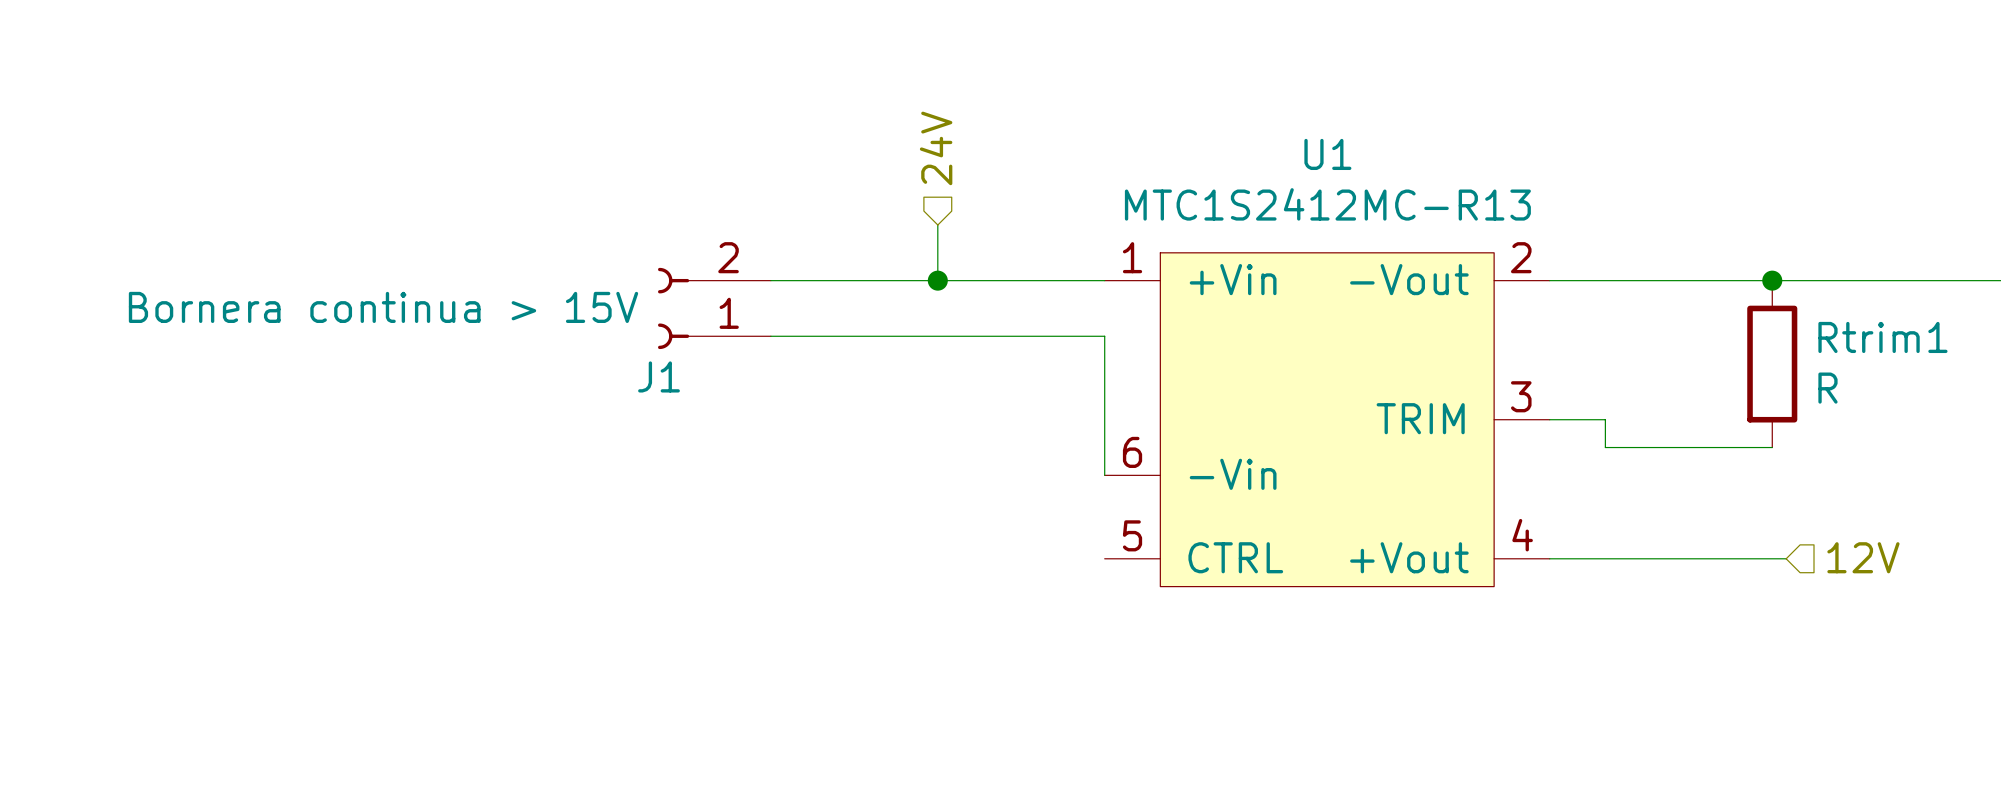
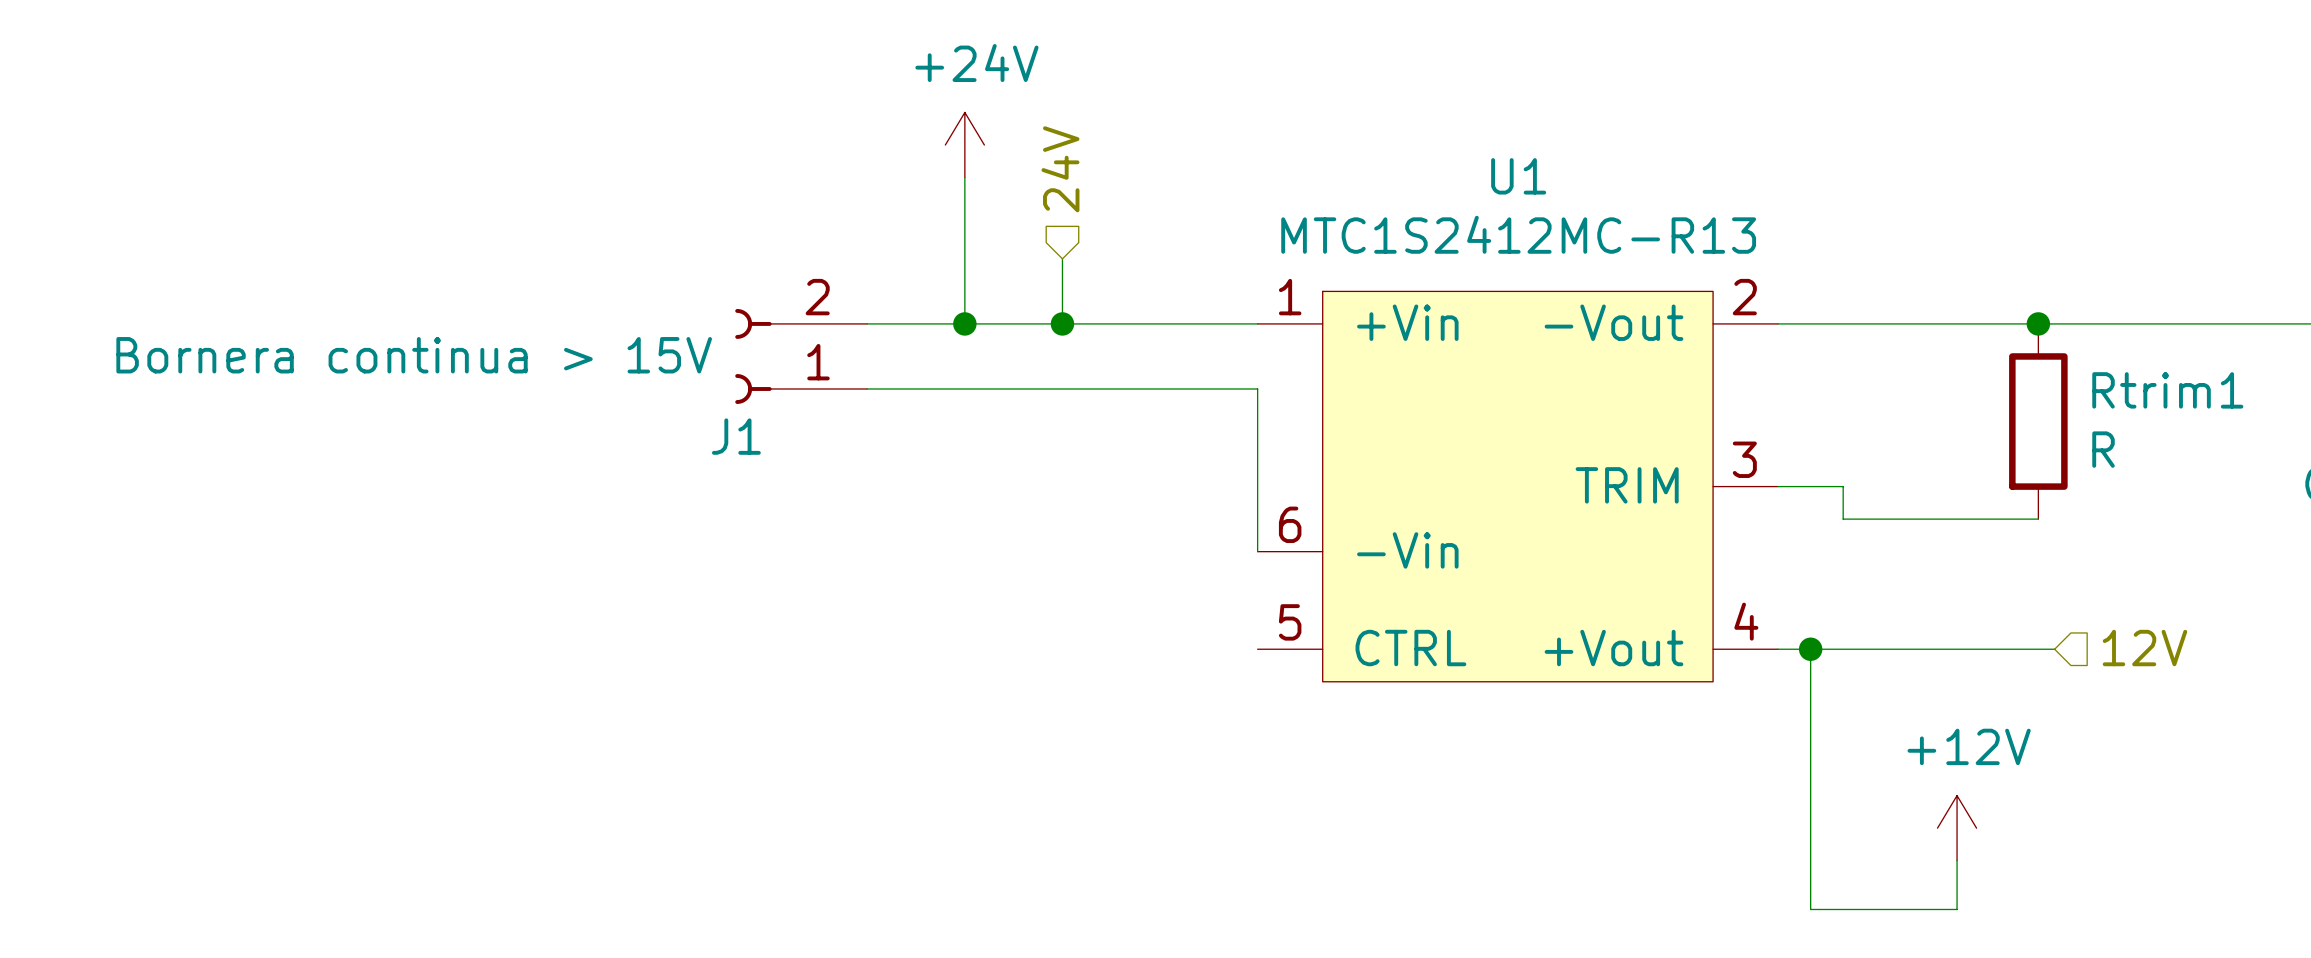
power symbol: none -> +24V (964, 145)
wire: none -> (964, 177) (964, 323)
junction: none -> (964, 323)
wire: none -> (1810, 649) (1810, 909) (1957, 909) (1957, 860)
junction: none -> (1810, 649)
power symbol: none -> +12V (1957, 828)

